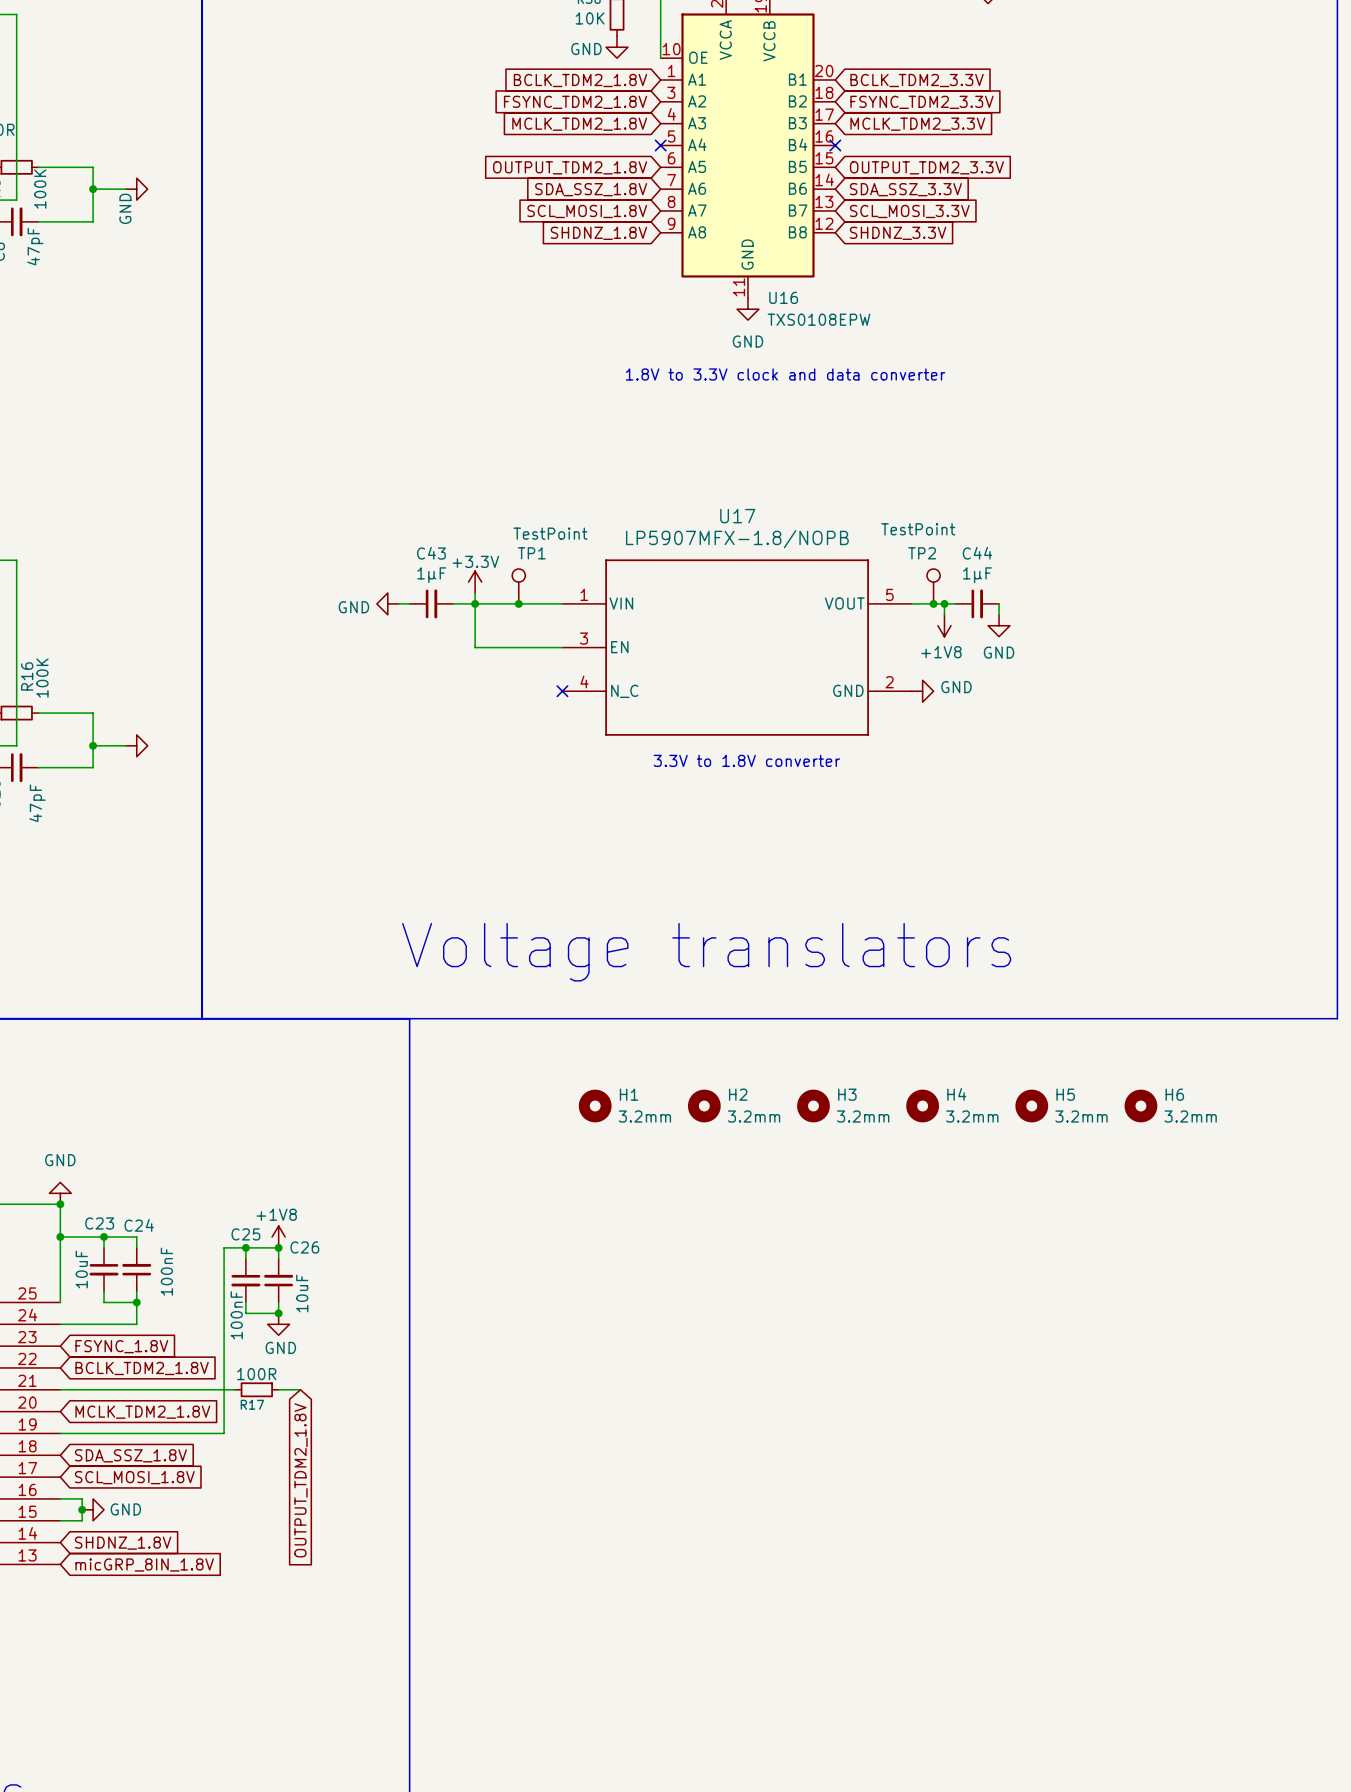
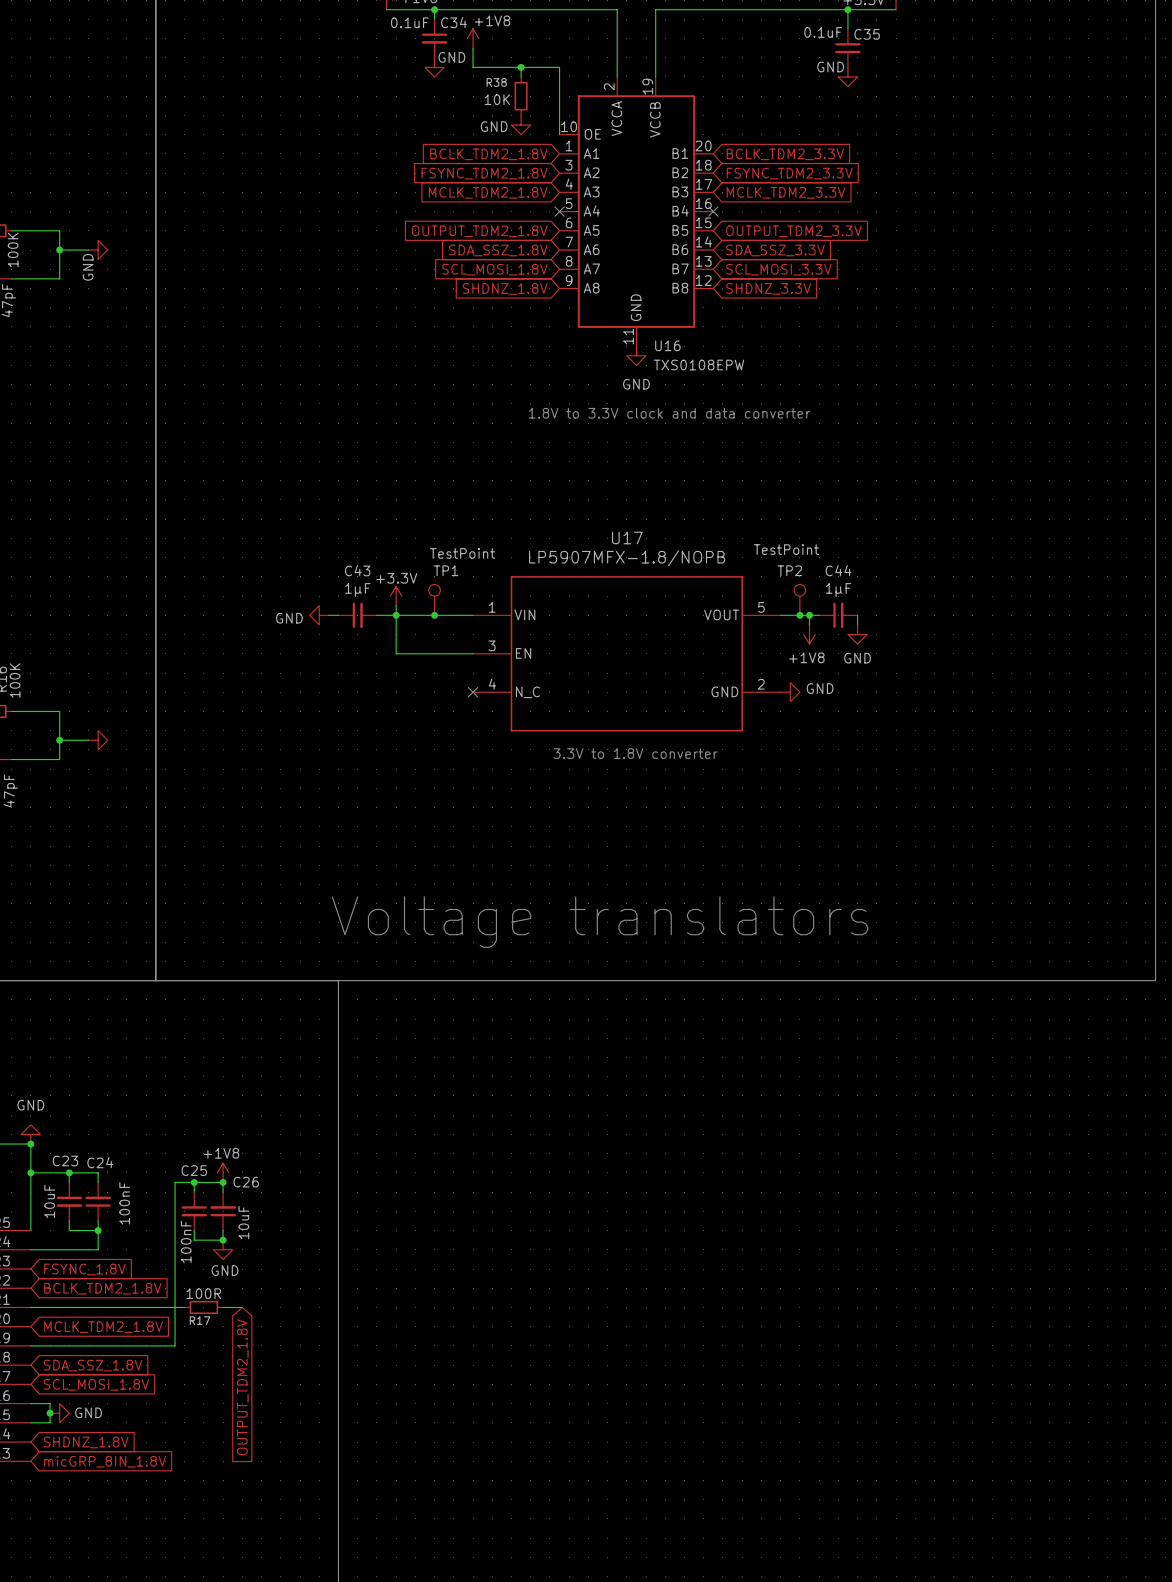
H1: 3.2mm (595, 1106) -> none
H2: 3.2mm (704, 1106) -> none
H3: 3.2mm (813, 1106) -> none
H4: 3.2mm (922, 1106) -> none
H5: 3.2mm (1031, 1106) -> none
H6: 3.2mm (1140, 1106) -> none

